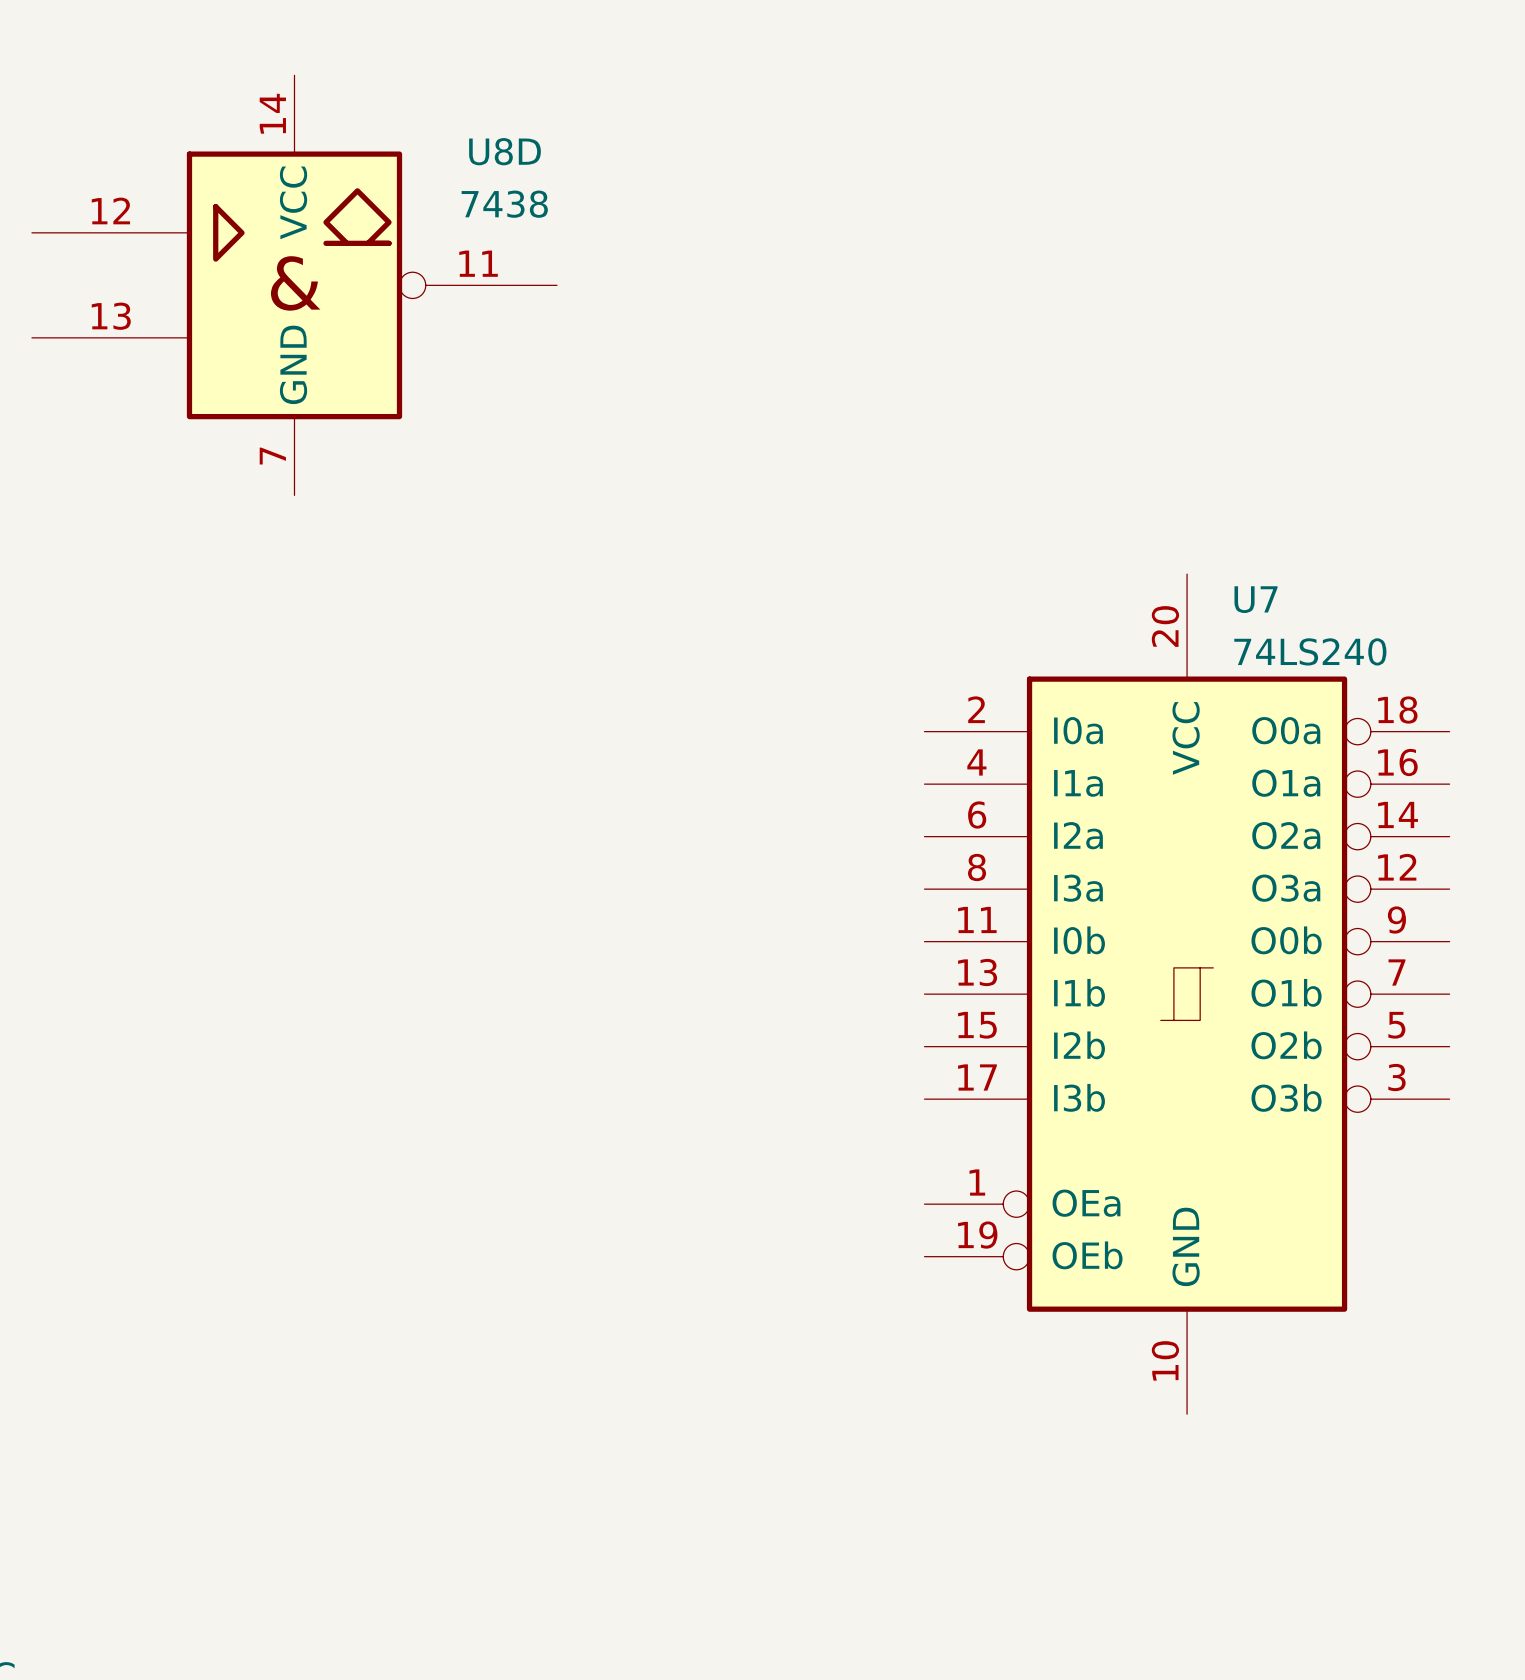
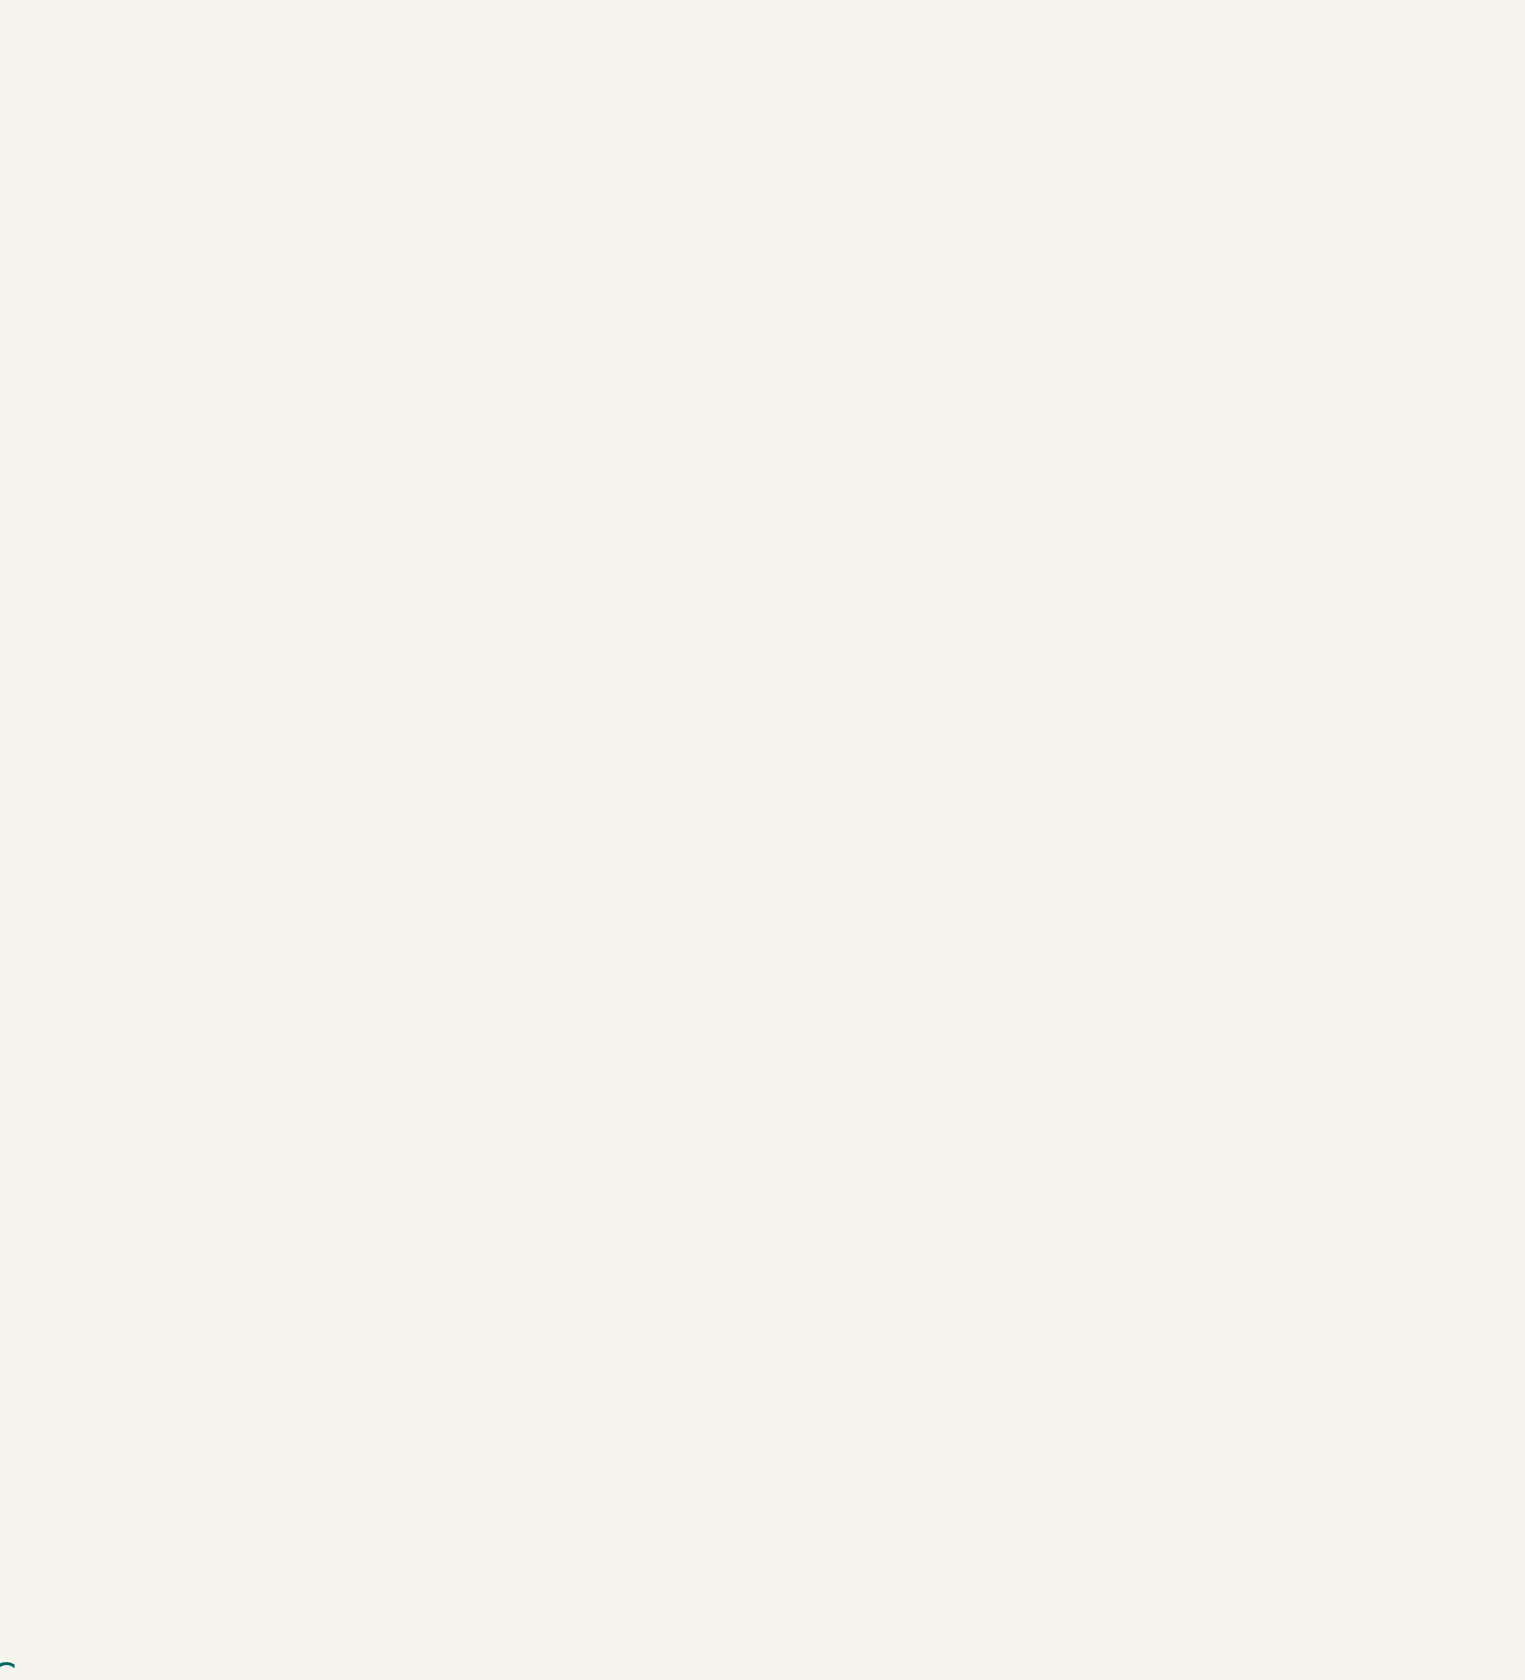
U8D: 7438 (294, 285) -> none
U7: 74LS240 (1187, 994) -> none

